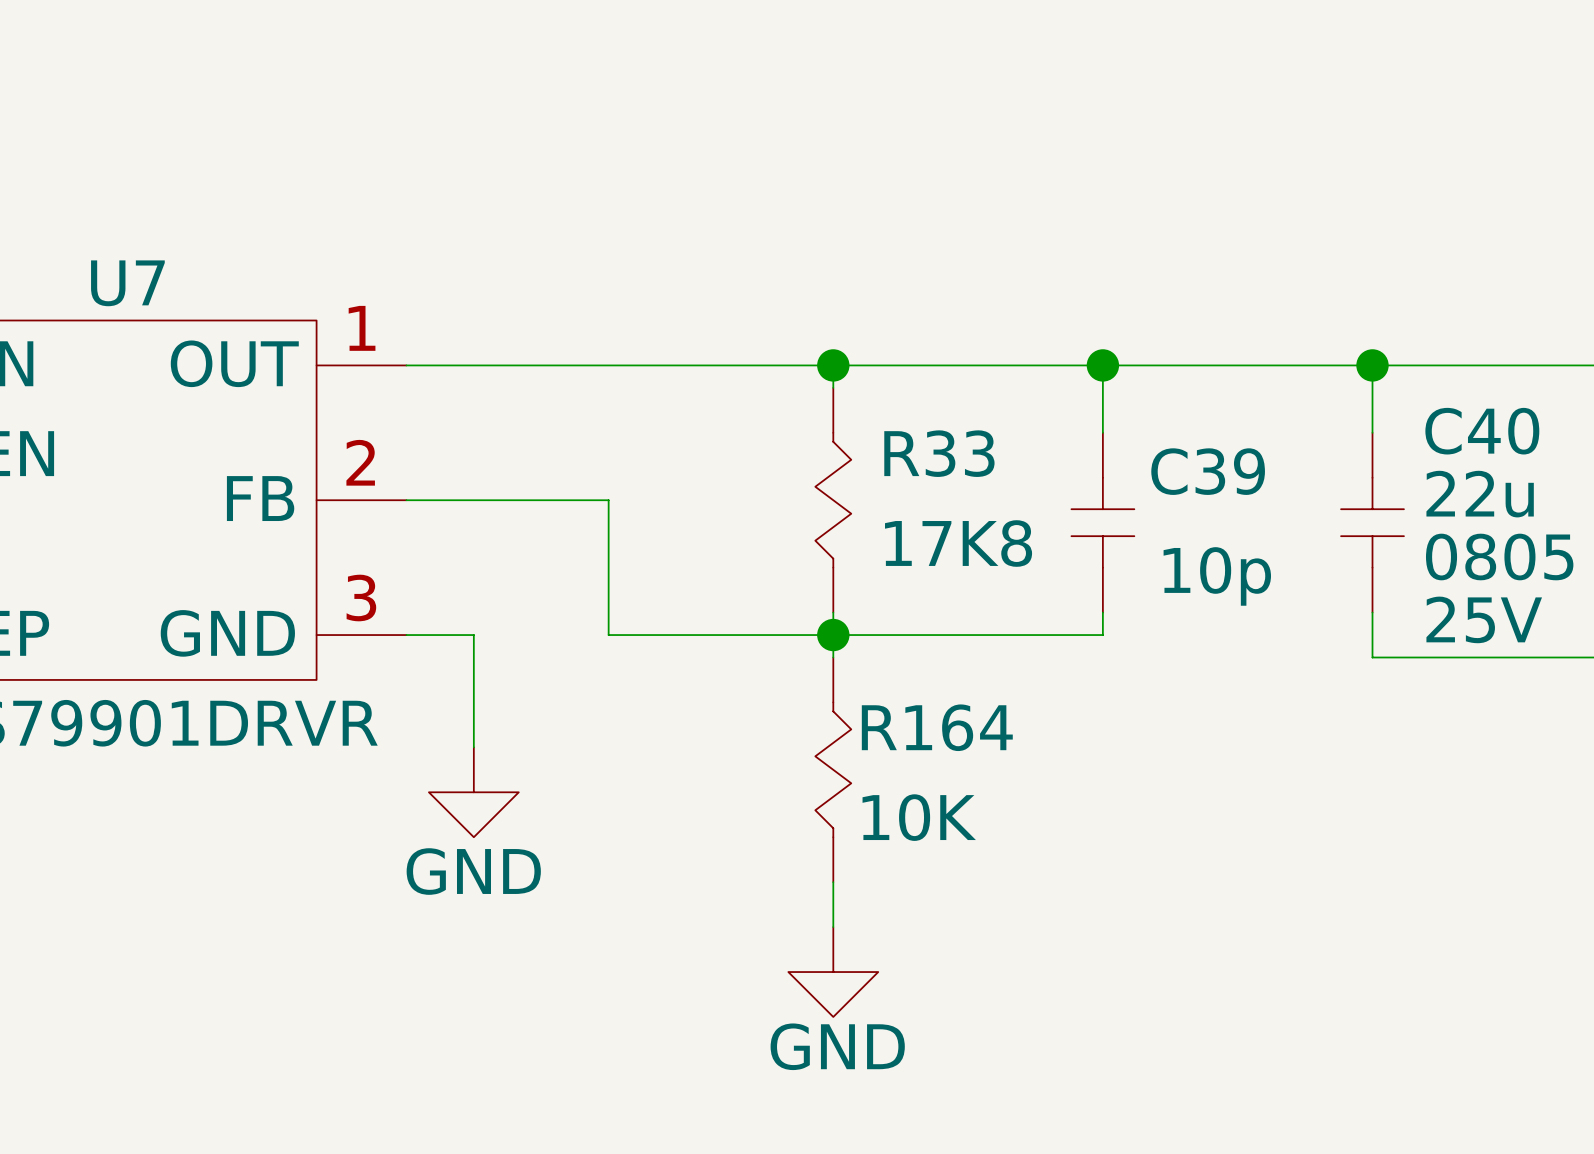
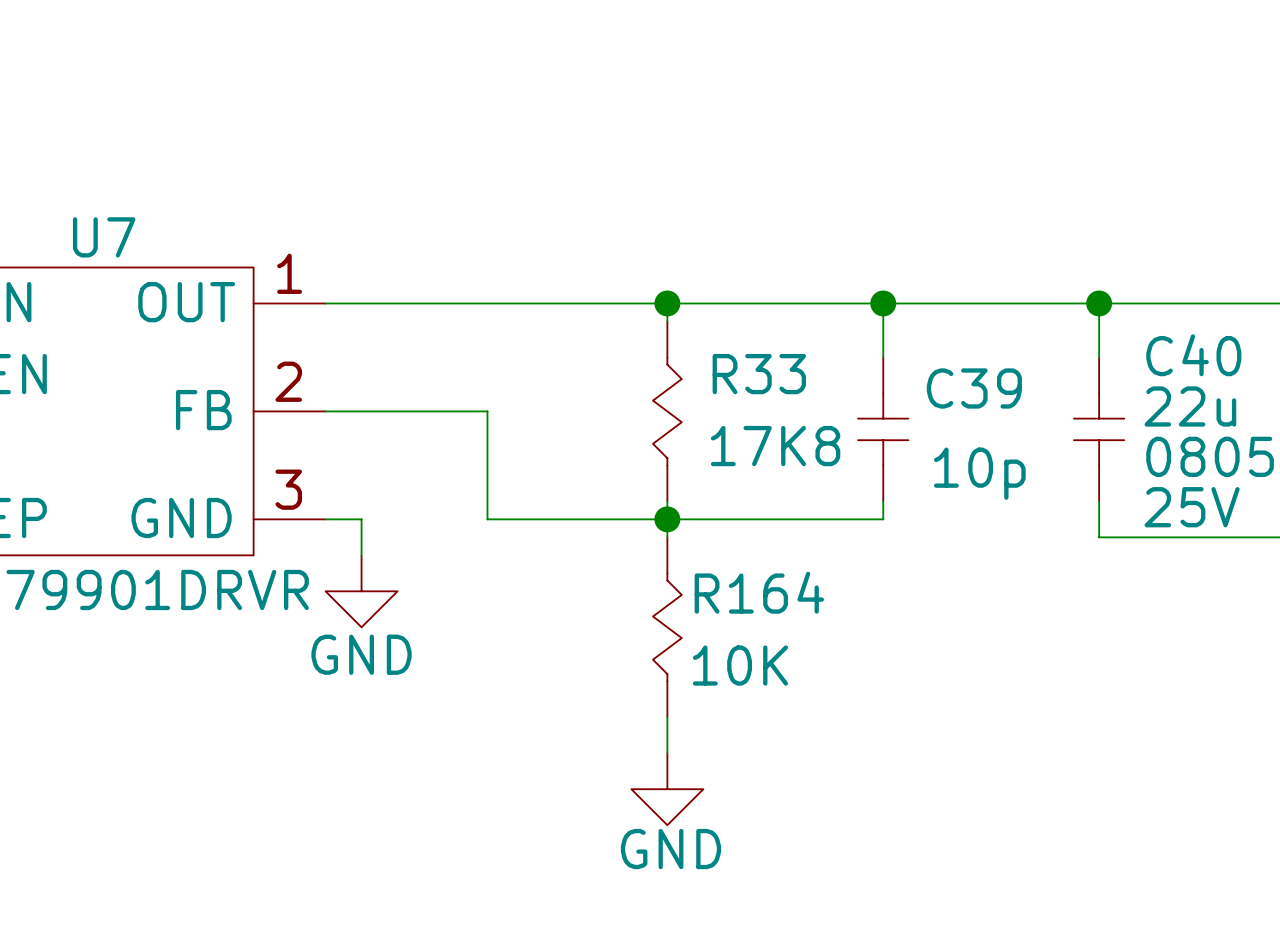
wire: (451, 635) (473, 635) (473, 747) -> (361, 519) (361, 555)
power symbol position: GND (473, 792) -> GND (361, 591)

